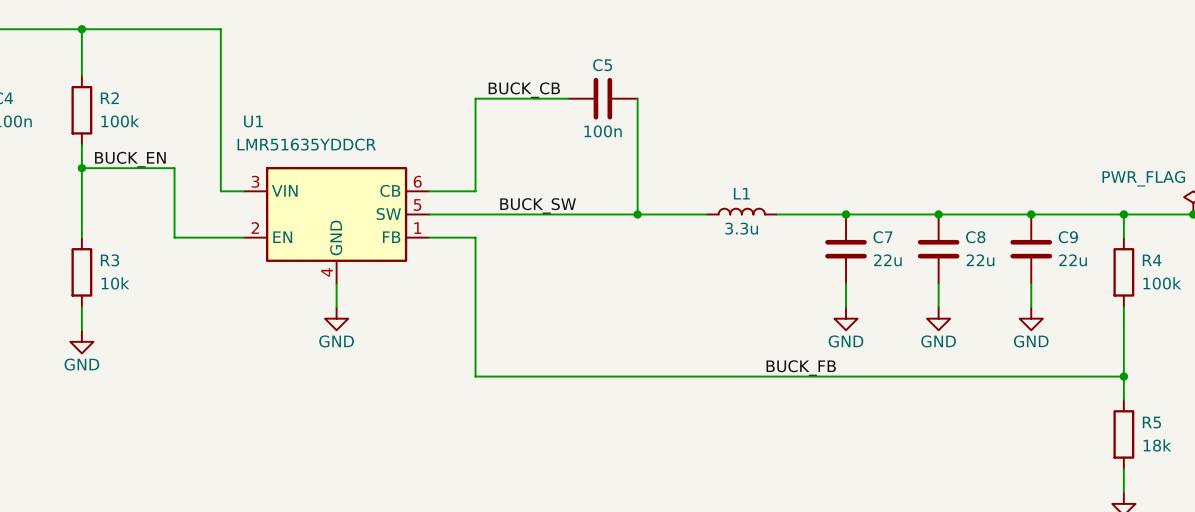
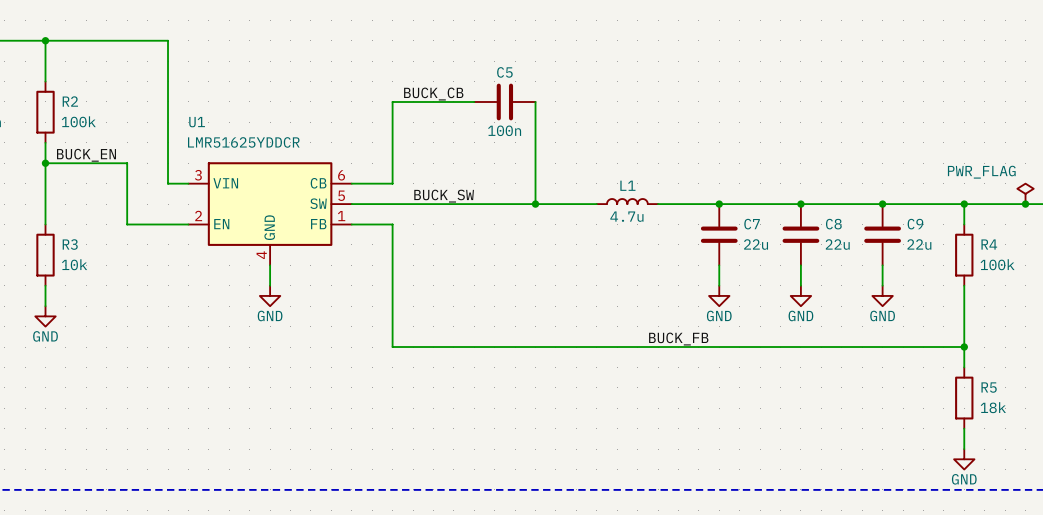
U1 value: LMR51635YDDCR (306, 144) -> LMR51625YDDCR (243, 142)
L1 value: 3.3u (741, 228) -> 4.7u (626, 216)

